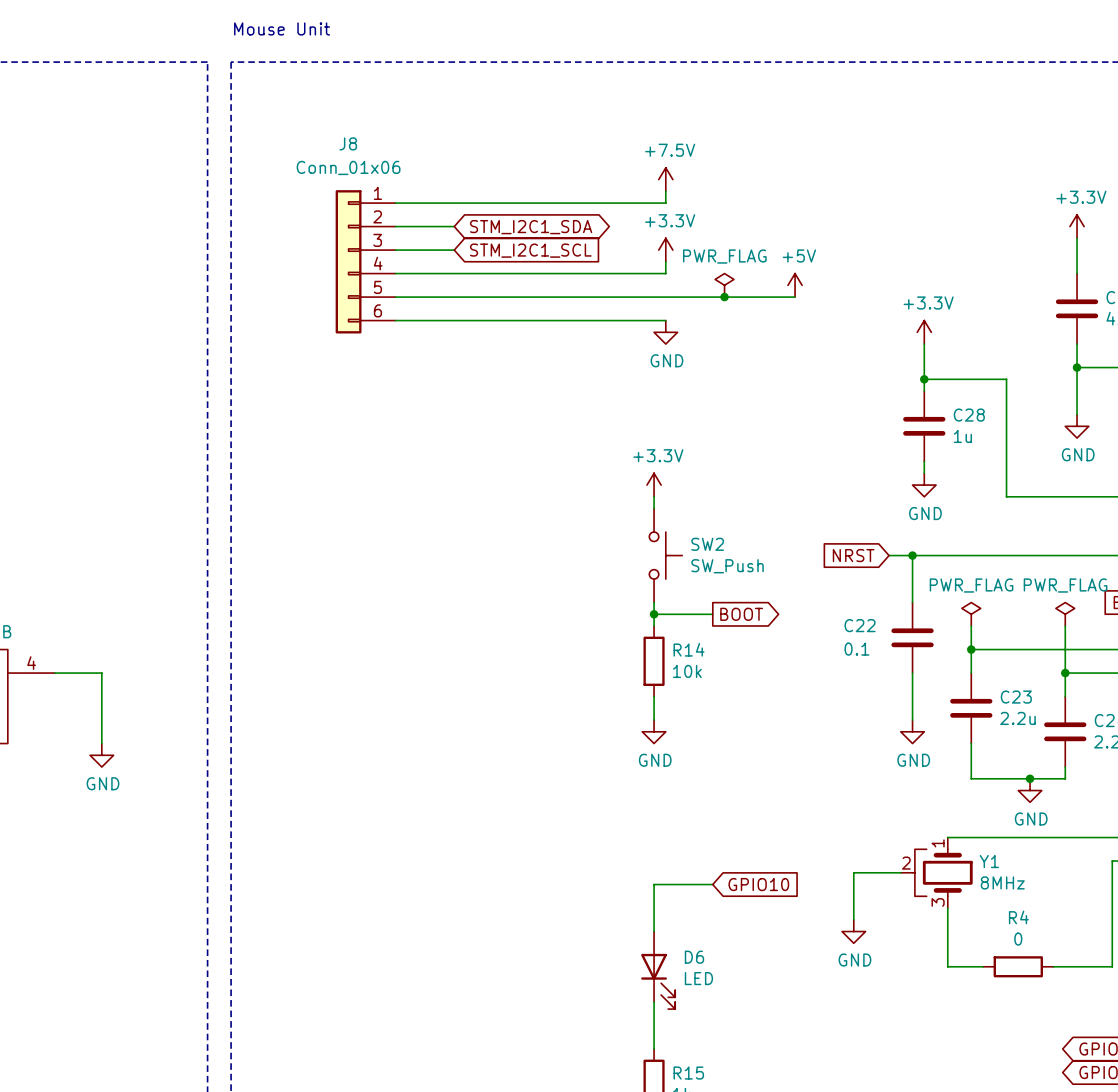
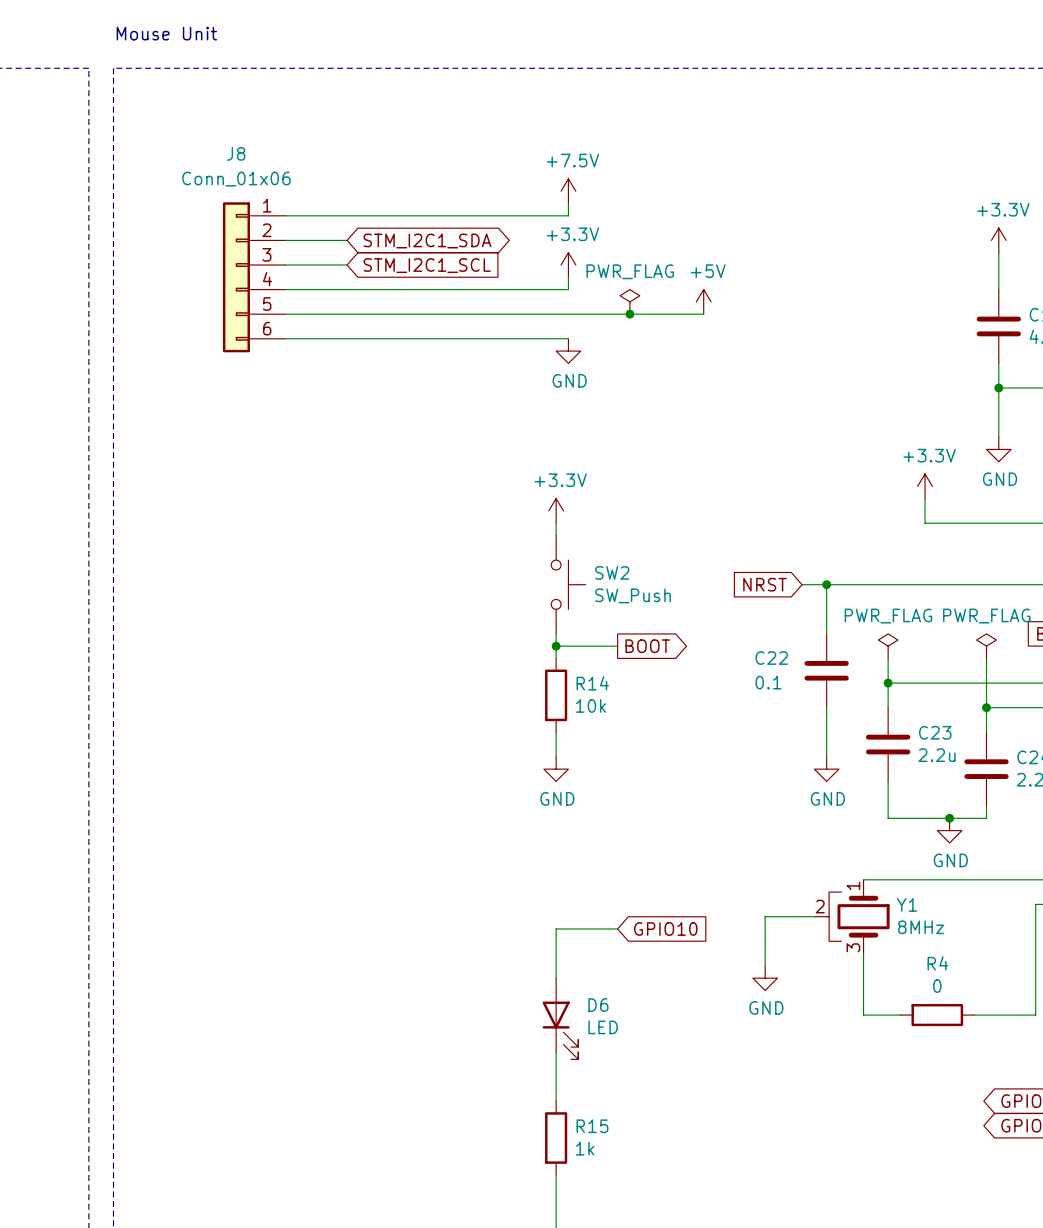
power symbol position: +3.3V (924, 332) -> +3.3V (925, 486)
wire: (924, 344) (924, 391) -> none
wire: (924, 379) (1006, 379) (1006, 473) -> none
junction: (924, 379) -> none
C28: 1u (924, 426) -> none
wire: (924, 461) (924, 473) -> none
power symbol: GND (924, 485) -> none

